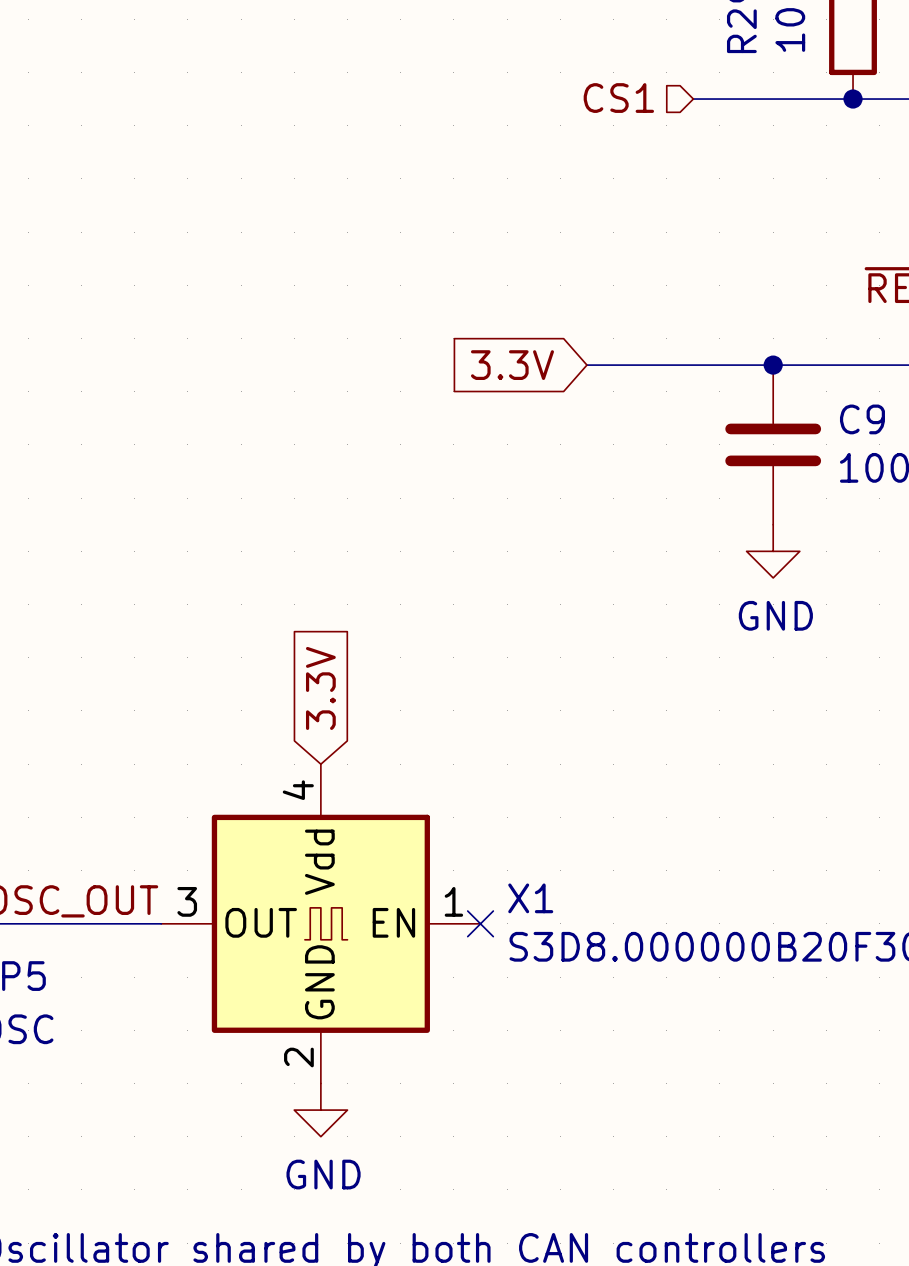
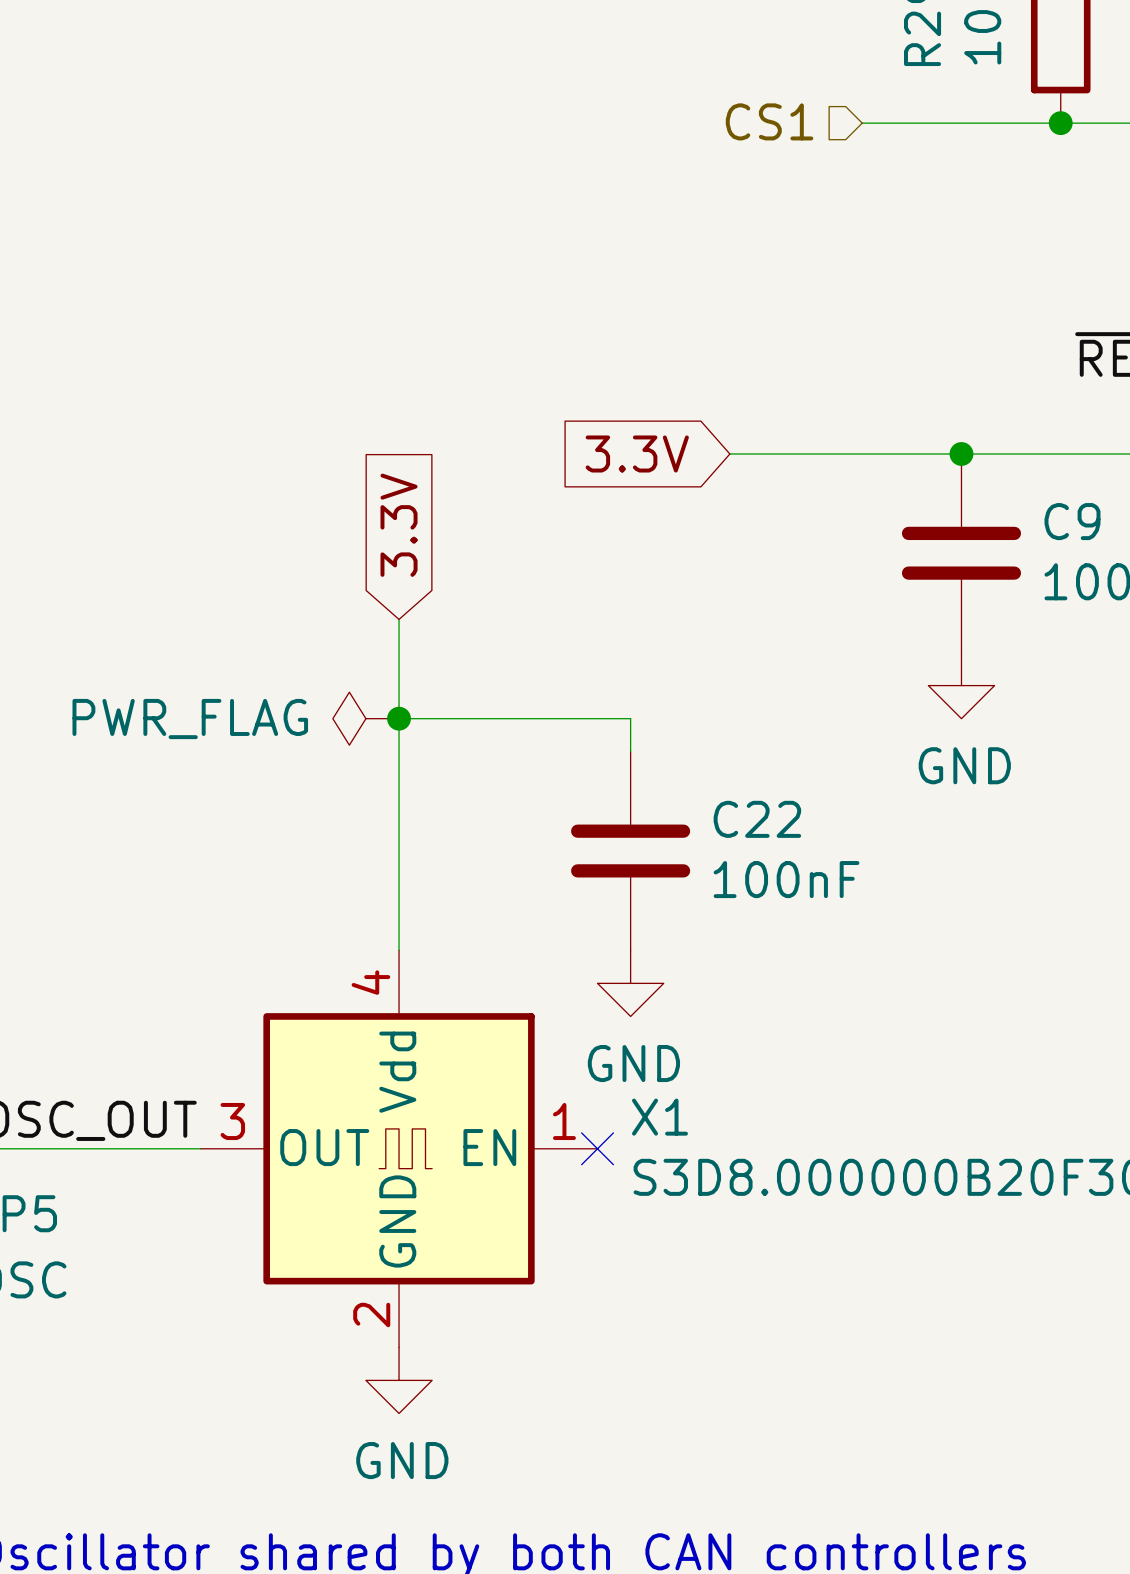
wire: none -> (399, 619) (399, 950)
power symbol: none -> PWR_FLAG (365, 718)
wire: none -> (399, 718) (630, 718) (630, 751)
junction: none -> (399, 718)
C22: none -> 100nF (630, 851)
global label position: 3.3V (320, 688) -> 3.3V (399, 525)
power symbol: none -> GND (630, 983)

